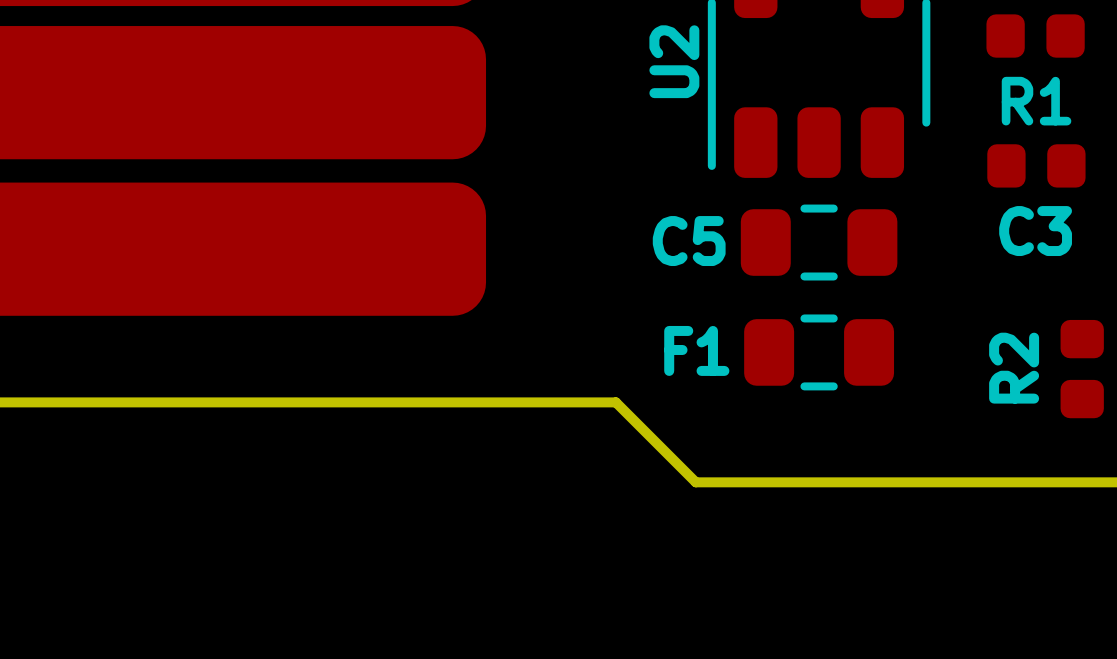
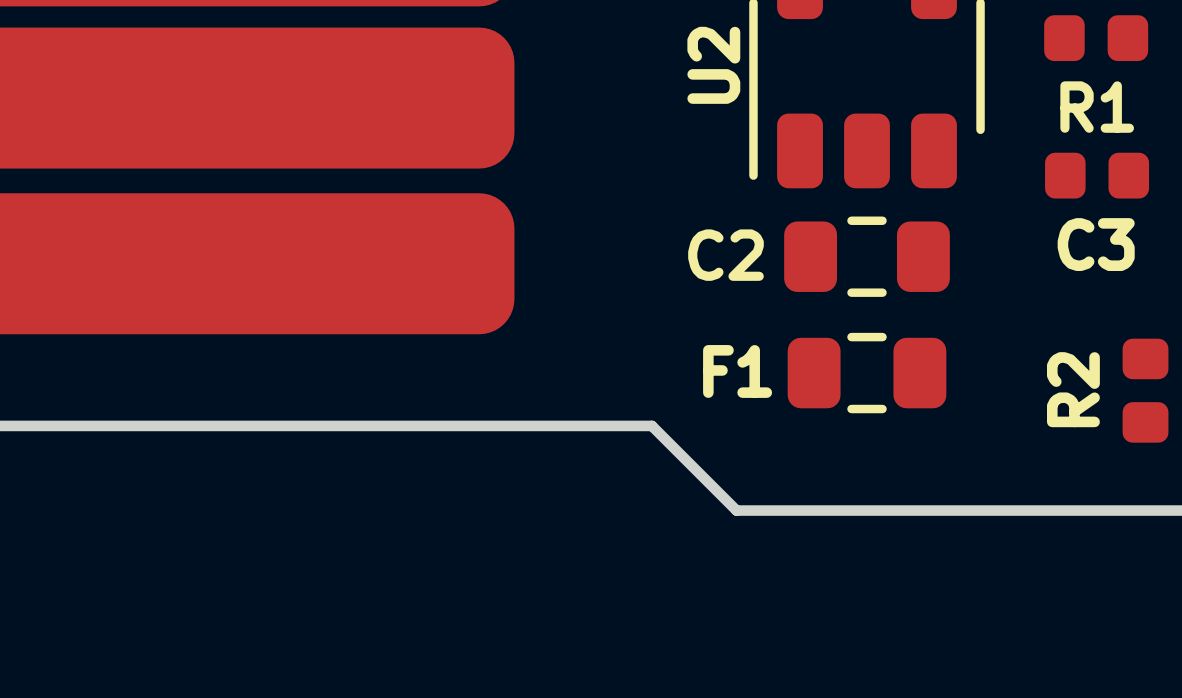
C5 name: C5 (689, 241) -> C2 (725, 255)

